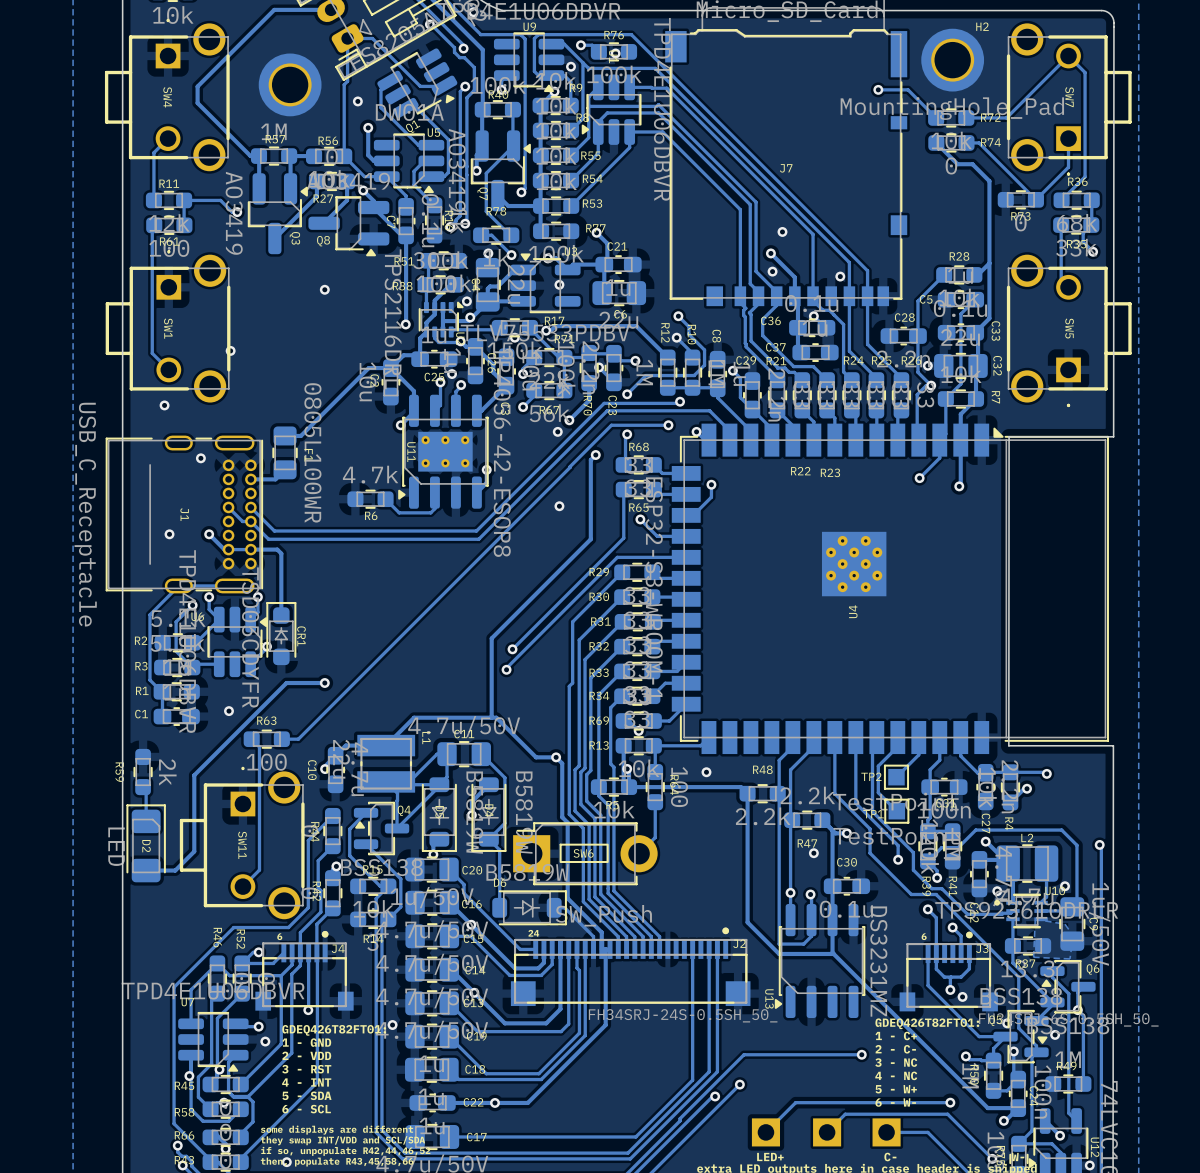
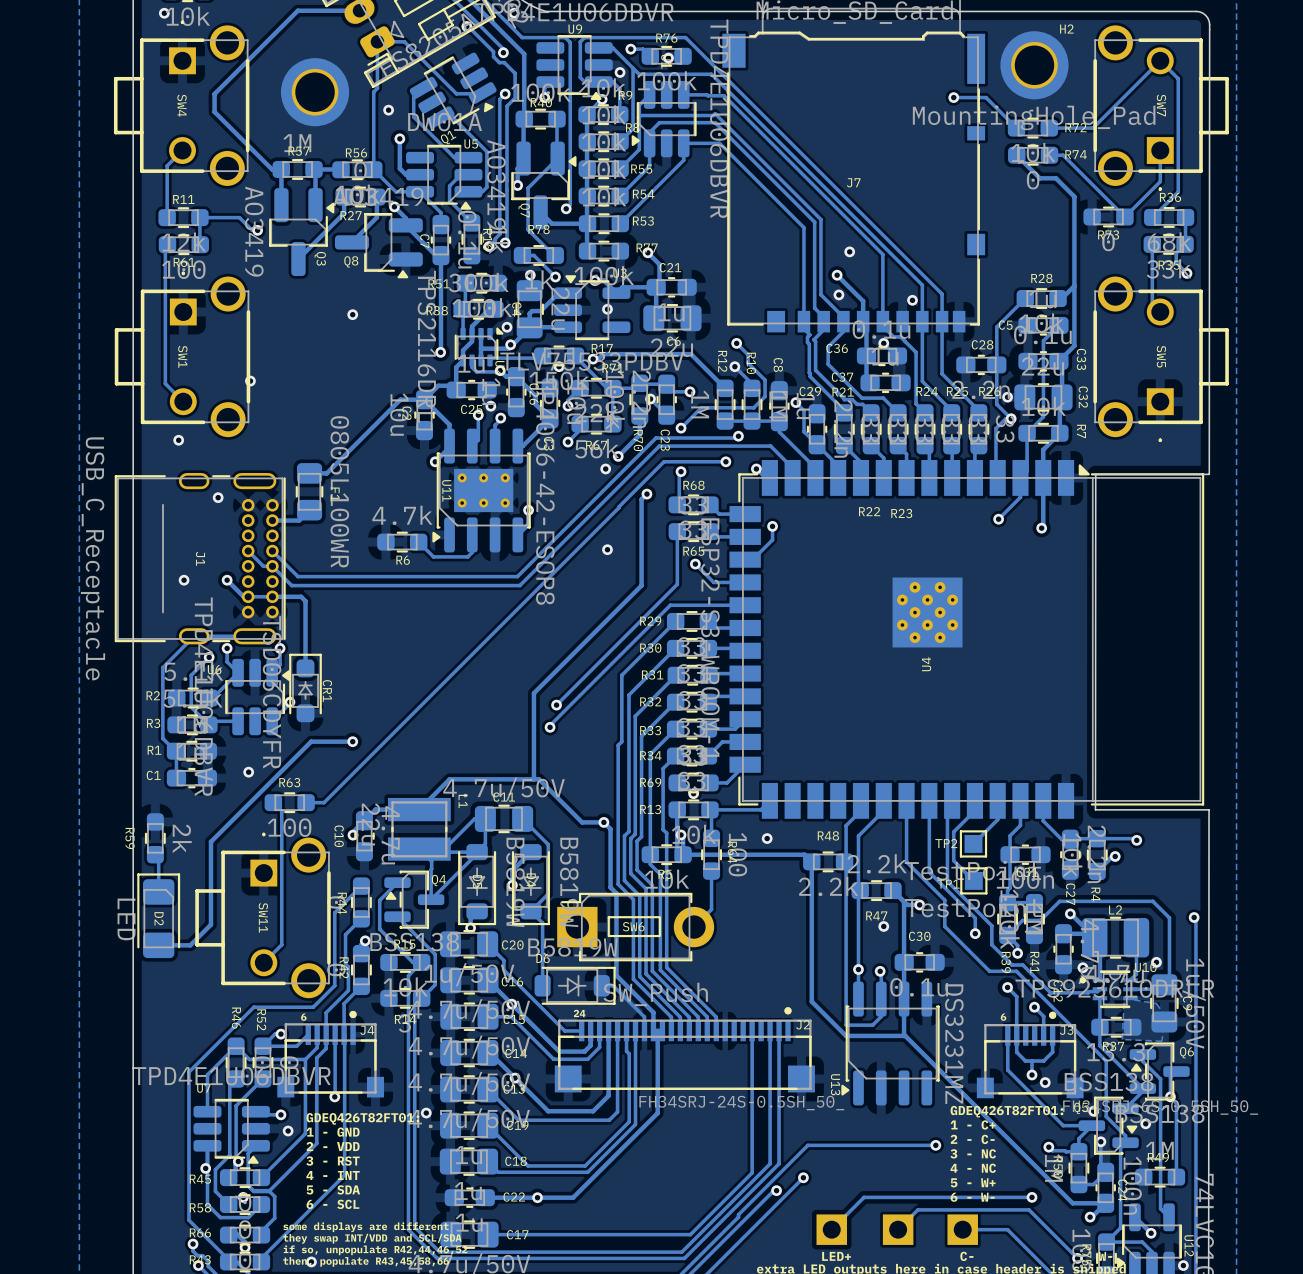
via: none -> (164, 13)

